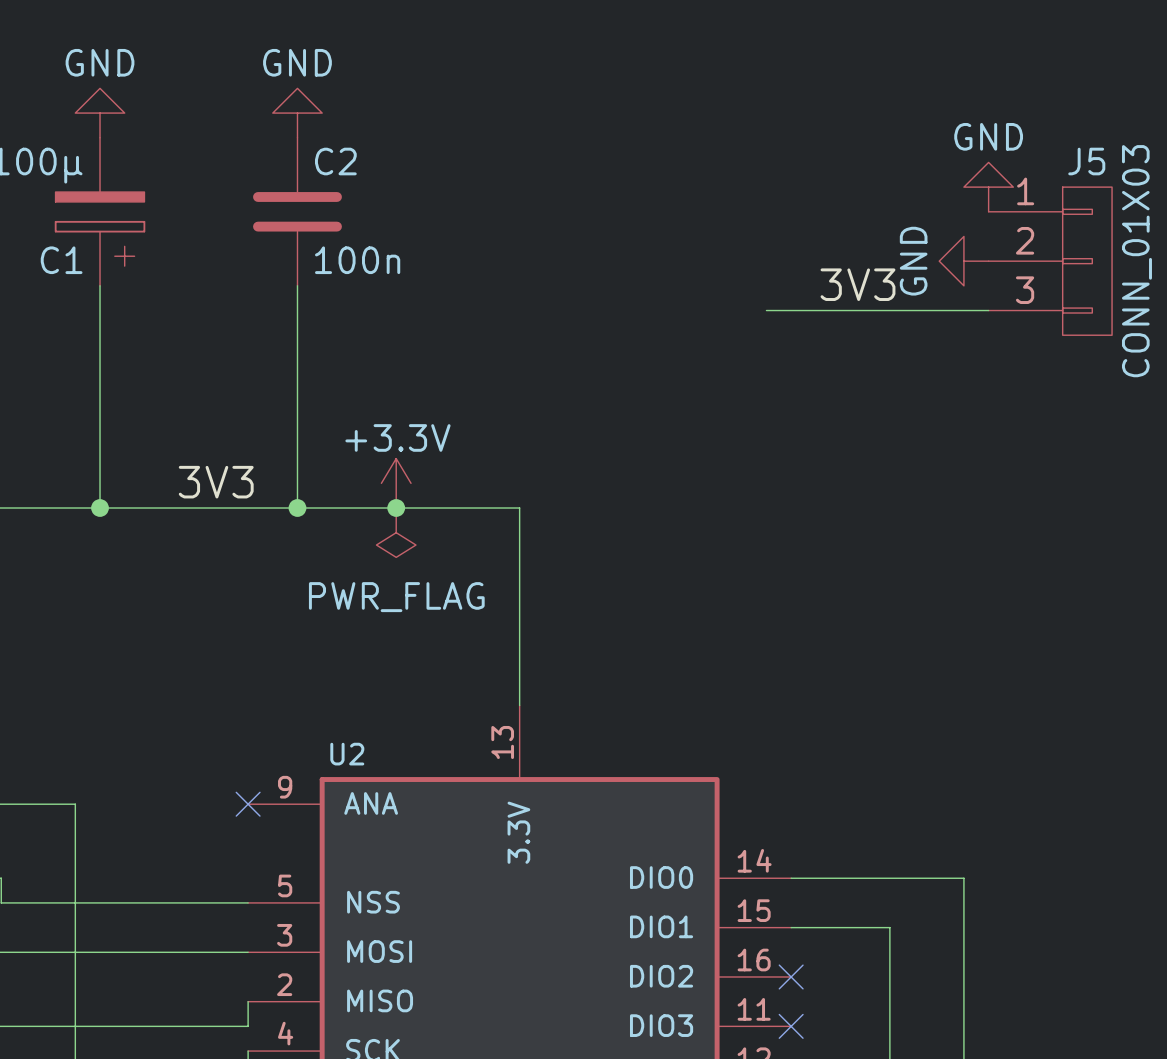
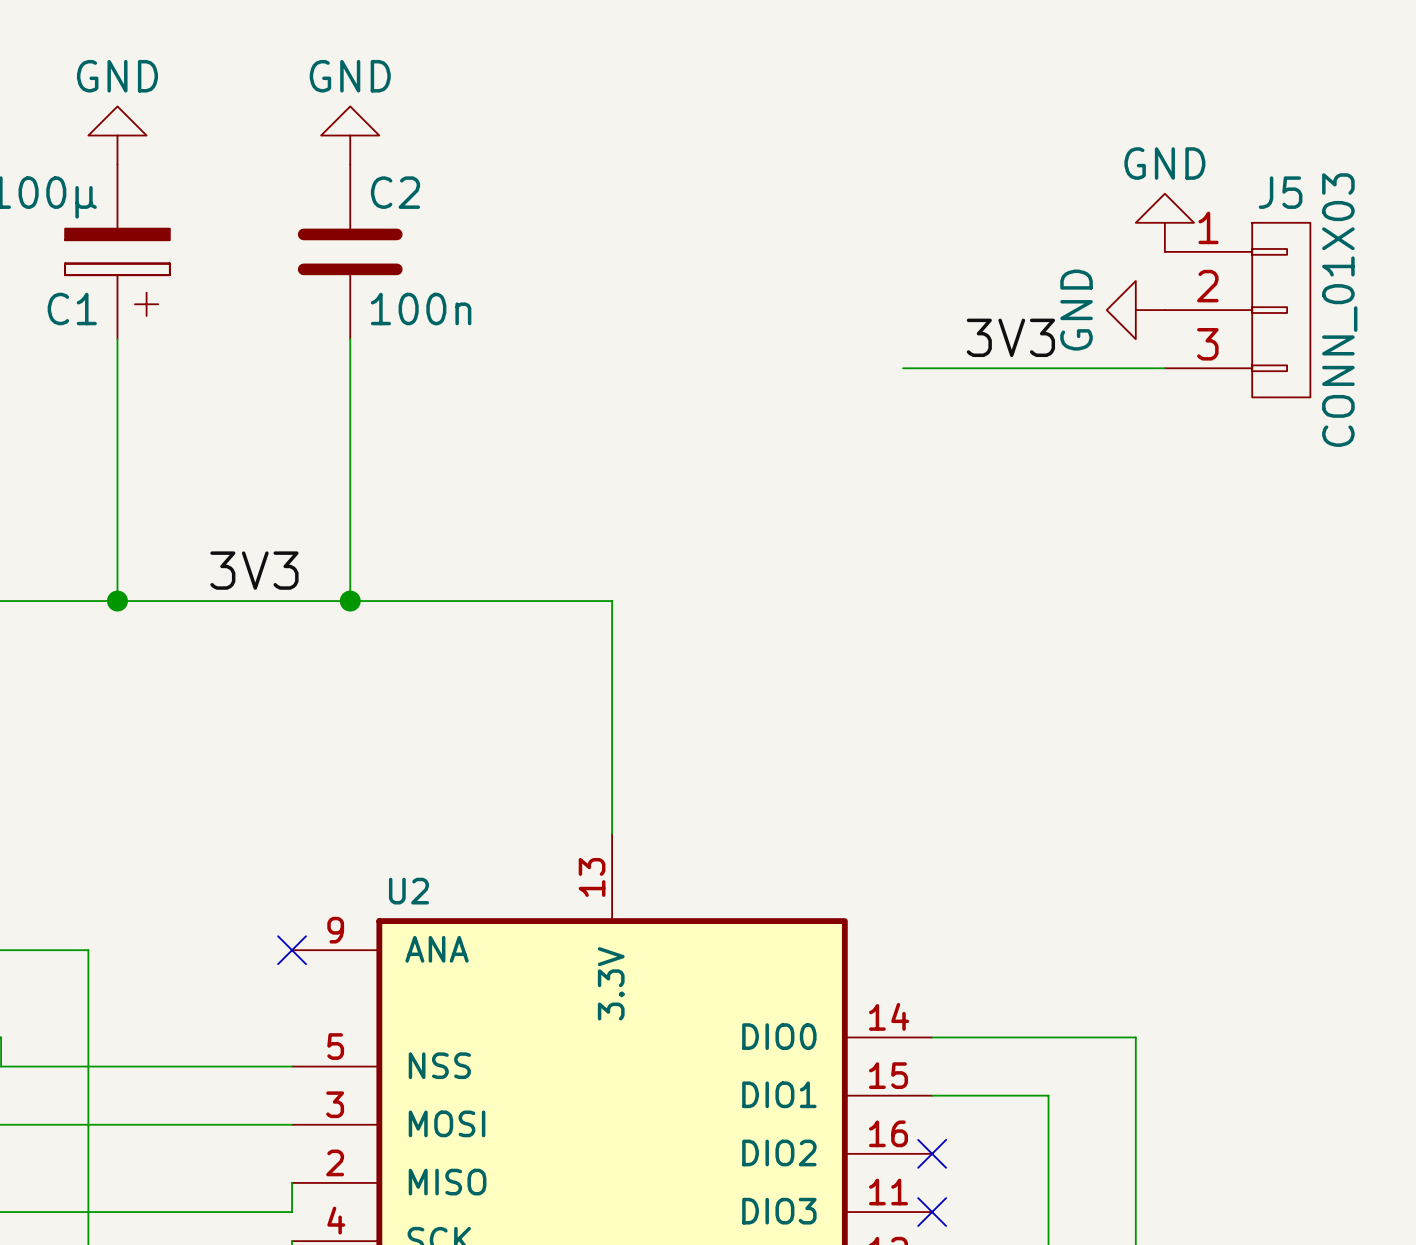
power symbol: +3.3V (396, 483) -> none
junction: (396, 508) -> none
power symbol: PWR_FLAG (396, 532) -> none

